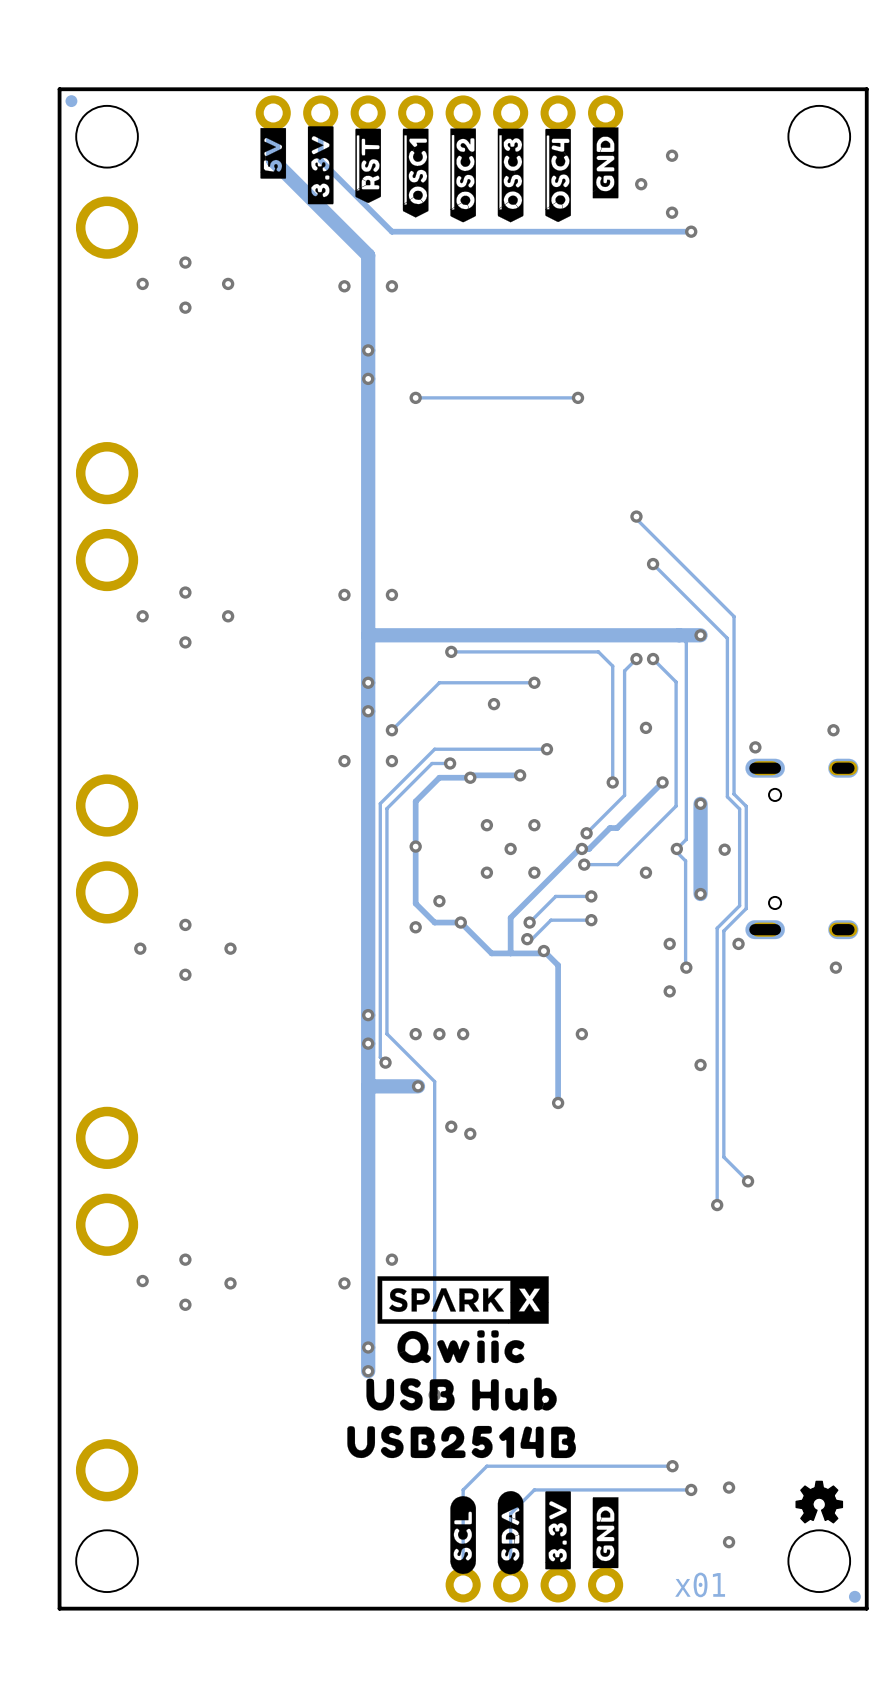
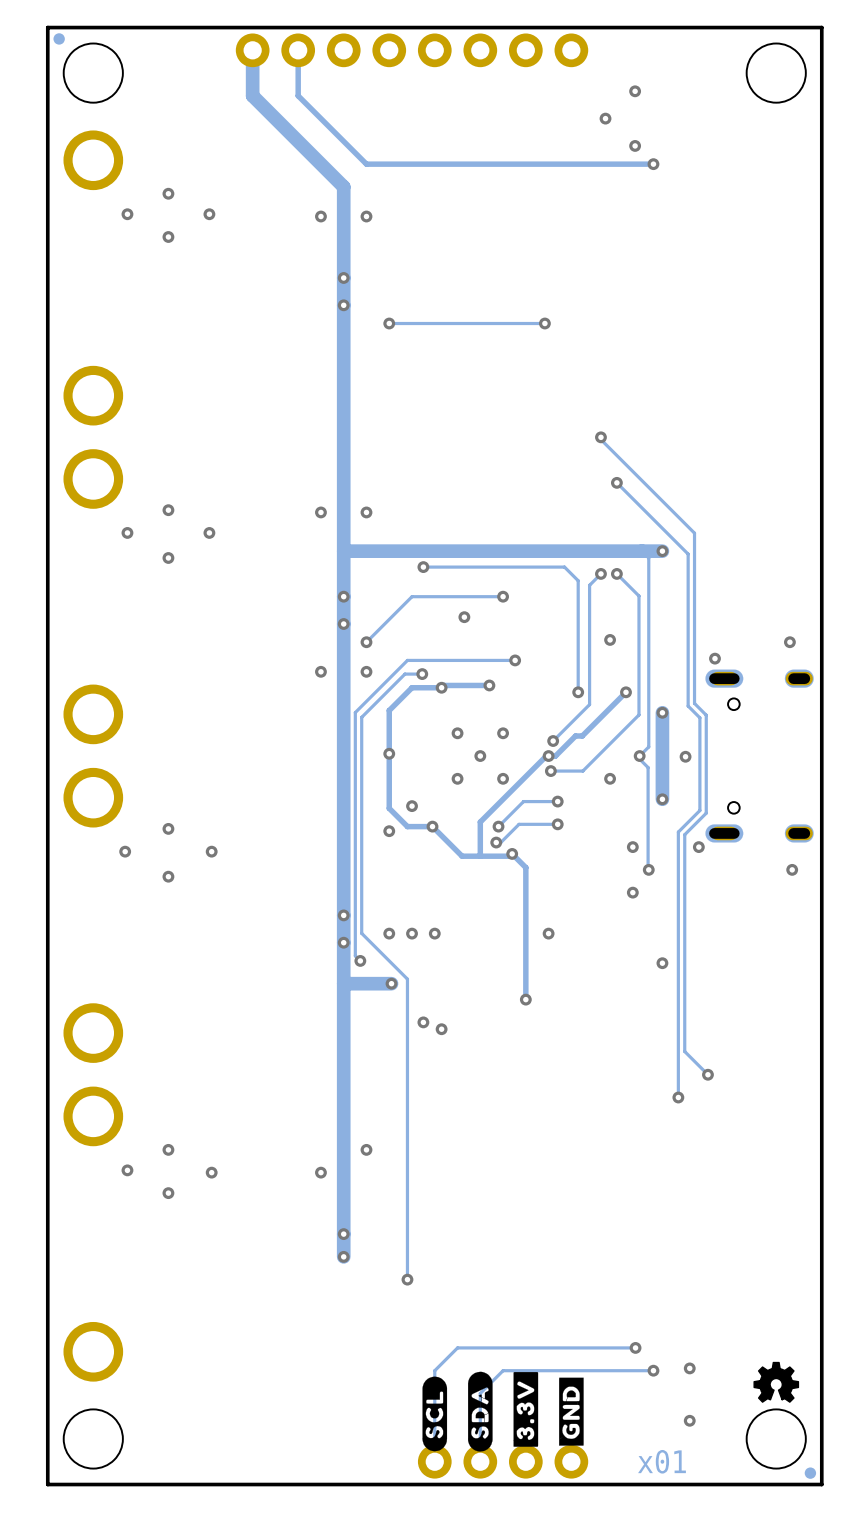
drawing: [260, 126, 619, 223] -> none
drawing: [347, 1276, 576, 1459] -> none

